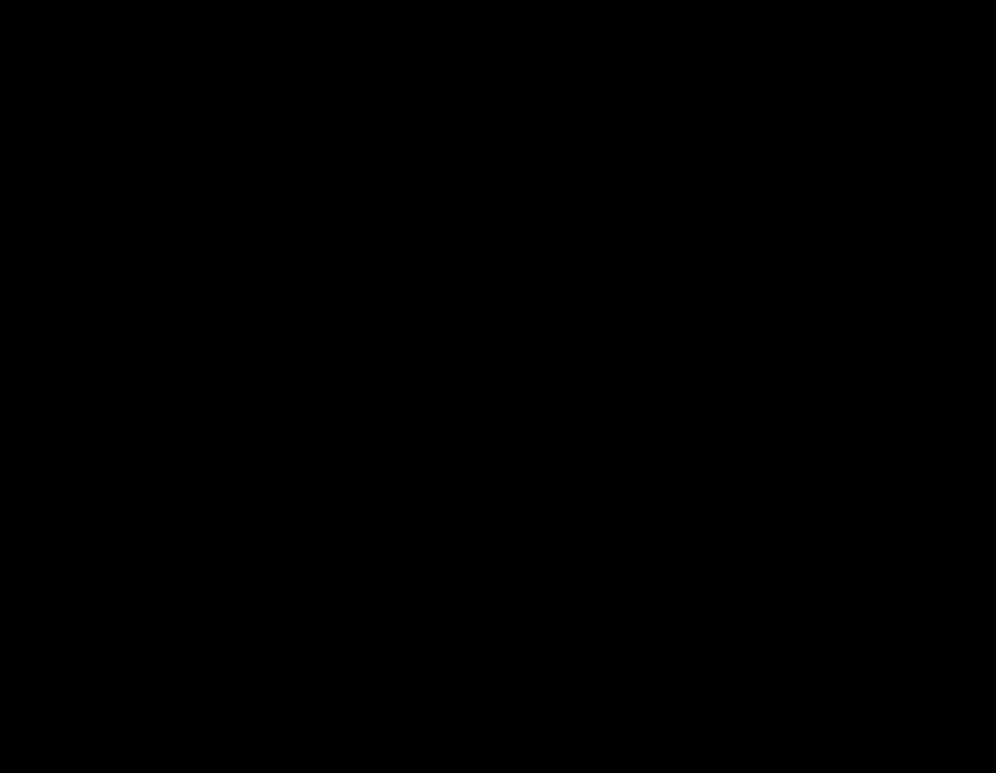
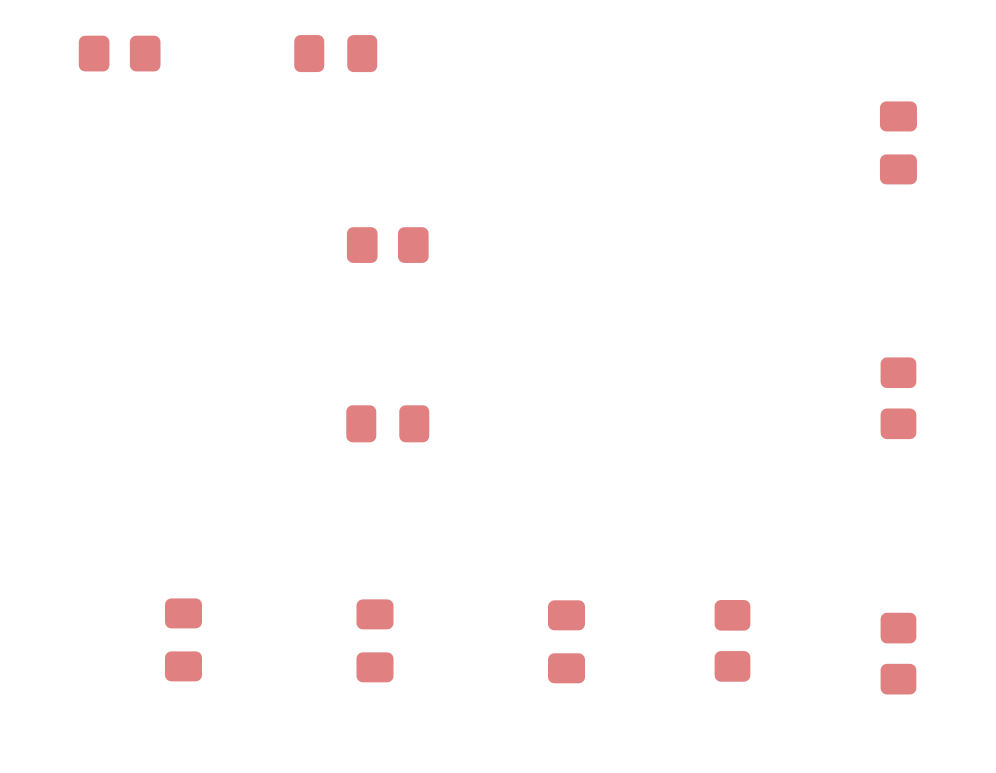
part: none -> (119, 53)
part: none -> (335, 53)
part: none -> (898, 142)
part: none -> (387, 245)
part: none -> (898, 398)
part: none -> (387, 423)
part: none -> (183, 639)
part: none -> (375, 640)
part: none -> (732, 640)
part: none -> (566, 641)
part: none -> (898, 653)

